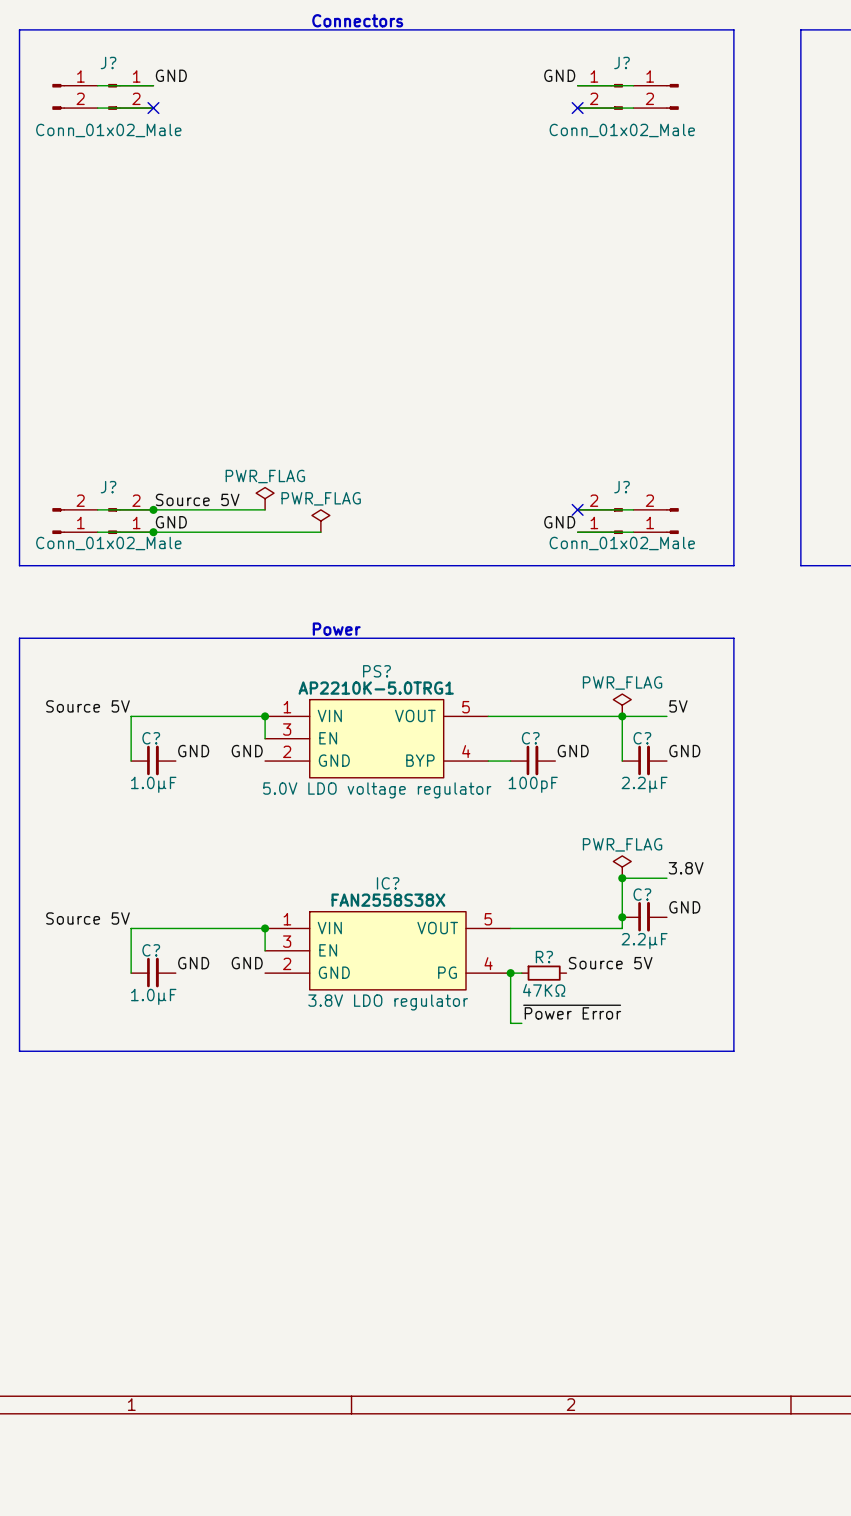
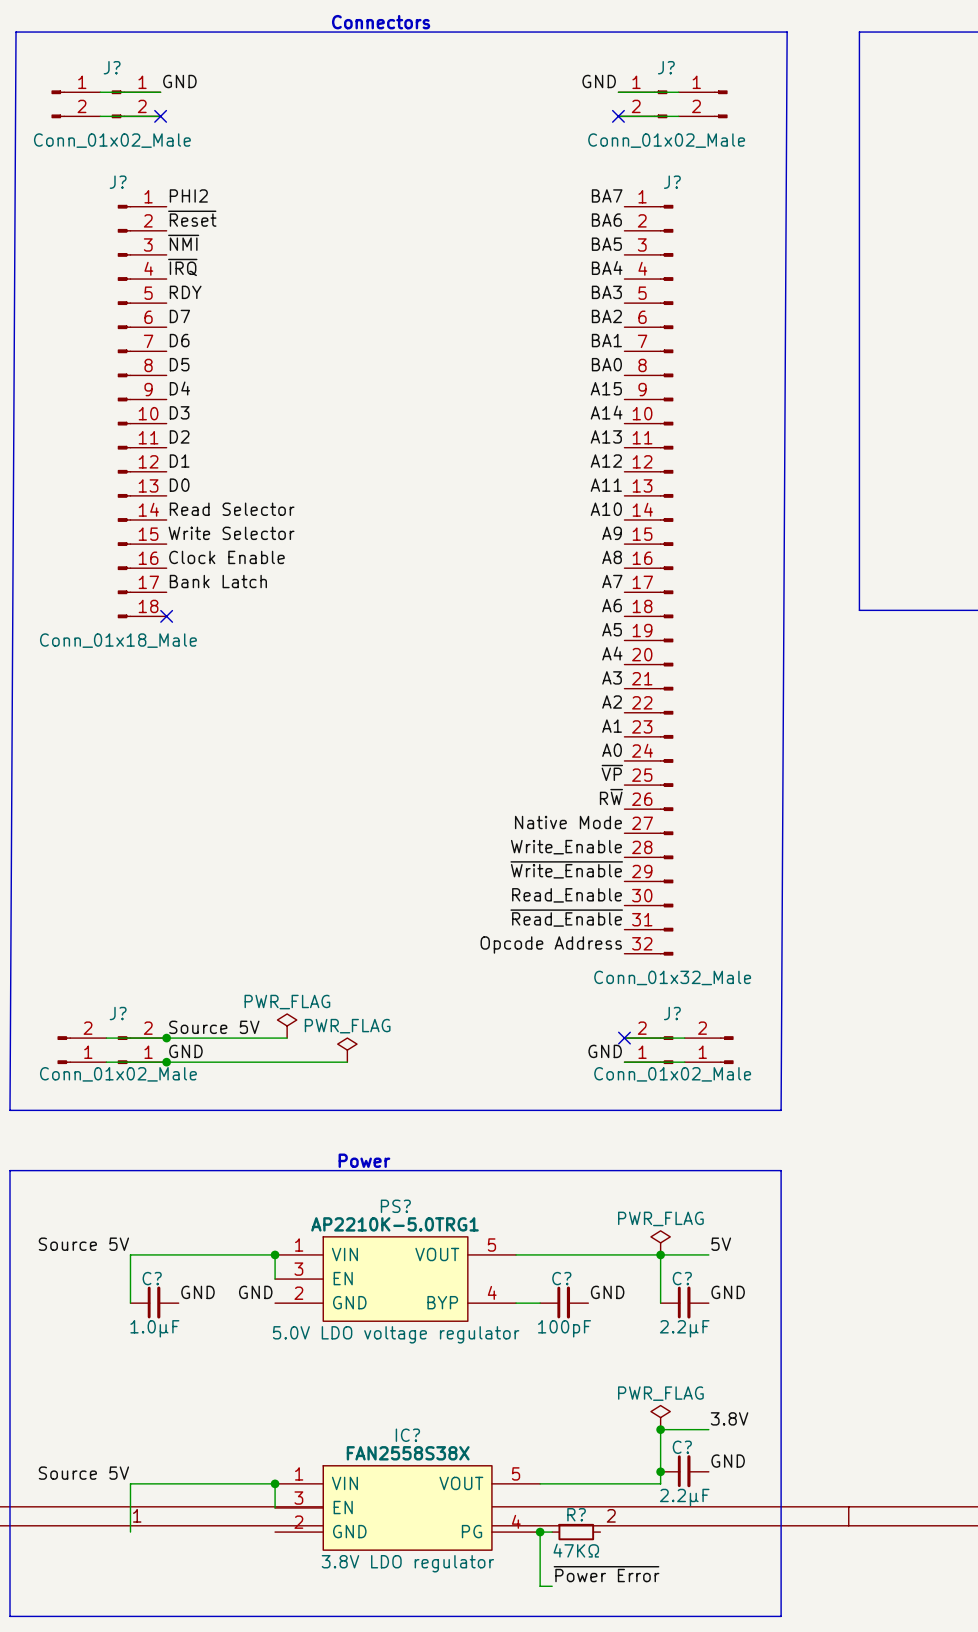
line: (19, 29) (19, 565) (733, 565) (733, 29) -> (16, 32) (10, 1110) (781, 1110) (787, 32)
label: none -> PHI2 (188, 195)
label: none -> BA7 (607, 195)
label: none -> ~{Reset} (192, 218)
label: none -> BA6 (606, 220)
label: none -> ~{NMI} (183, 242)
label: none -> BA5 (606, 244)
label: none -> ~{IRQ} (182, 267)
label: none -> BA4 (607, 267)
label: none -> RDY (185, 292)
label: none -> BA3 (606, 292)
label: none -> D7 (179, 316)
label: none -> BA2 (606, 316)
label: none -> D6 (179, 340)
label: none -> BA1 (606, 340)
label: none -> D5 (179, 364)
label: none -> BA0 (606, 364)
label: none -> D4 (179, 388)
label: none -> A15 (606, 388)
J?: none -> Conn_01x18_Male (142, 411)
label: none -> D3 (179, 412)
label: none -> A14 (606, 412)
label: none -> D2 (179, 436)
label: none -> A13 (606, 436)
label: none -> D1 (179, 461)
label: none -> A12 (606, 461)
label: none -> D0 (179, 485)
label: none -> A11 (606, 485)
label: none -> Read Selector (232, 509)
label: none -> A10 (606, 509)
label: none -> A9 (612, 533)
power symbol: PWR_FLAG (265, 498) -> none
label: Source 5V (197, 499) -> Write Selector (231, 533)
wire: (97, 509) (265, 509) -> none
junction: (153, 509) -> none
wire: (577, 509) (633, 509) -> none
no-connect mark: (577, 509) -> none
part: (74, 521) -> none
J?: Conn_01x02_Male (130, 521) -> none
power symbol: PWR_FLAG (320, 521) -> none
J?: Conn_01x02_Male (600, 521) -> none
part: (656, 521) -> none
label: GND (171, 522) -> Clock Enable (226, 557)
label: GND (559, 522) -> A8 (612, 557)
wire: (97, 532) (320, 532) -> none
junction: (153, 532) -> none
wire: (577, 532) (633, 532) -> none
J?: none -> Conn_01x32_Male (648, 580)
label: none -> Bank Latch (218, 581)
label: none -> A7 (612, 581)
label: none -> A6 (612, 605)
no-connect mark: none -> (166, 616)
label: none -> A5 (612, 629)
label: none -> A4 (612, 653)
label: none -> A3 (612, 677)
text: Power (336, 629) -> none
line: (19, 638) (19, 1051) (733, 1051) (733, 638) (19, 638) -> none
label: none -> A2 (612, 702)
label: none -> A1 (612, 726)
label: none -> A0 (612, 750)
power symbol: PWR_FLAG (622, 705) -> none
label: Source 5V (88, 706) -> none
label: 5V (678, 706) -> none
junction: (265, 716) -> none
wire: (488, 716) (666, 716) -> none
label: none -> ~{VP} (612, 772)
wire: (622, 716) (622, 761) -> none
junction: (622, 716) -> none
wire: (265, 738) (265, 716) (131, 716) (131, 761) -> none
PS?: AP2210K-5.0TRG1 (376, 738) -> none
label: none -> R~{W} (611, 797)
label: GND (193, 751) -> none
label: GND (247, 751) -> none
label: GND (573, 751) -> none
label: GND (684, 751) -> none
C?: (153, 760) -> none
C?: (532, 760) -> none
C?: (644, 760) -> none
label: none -> Native Mode (568, 822)
label: none -> Write_Enable (566, 847)
label: none -> ~{Write_Enable} (566, 869)
label: none -> Read_Enable (567, 895)
label: none -> ~{Read_Enable} (566, 918)
power symbol: PWR_FLAG (622, 867) -> none
label: 3.8V (686, 868) -> none
label: none -> Opcode Address (551, 944)
junction: (622, 878) -> none
wire: (666, 878) (622, 878) (622, 928) (510, 928) -> none
label position: GND (684, 907) -> GND (605, 1051)
C?: (644, 916) -> none
junction: (622, 917) -> none
label position: Source 5V (88, 918) -> Source 5V (214, 1027)
junction: (265, 928) -> none
wire: (265, 950) (265, 928) (131, 928) (131, 973) -> none
power symbol: none -> PWR_FLAG (287, 1026)
IC?: FAN2558S38X (387, 950) -> none
wire: none -> (106, 1038) (287, 1038)
junction: none -> (166, 1038)
wire: none -> (624, 1038) (684, 1038)
no-connect mark: none -> (624, 1038)
label position: GND (193, 963) -> GND (185, 1051)
label: GND (247, 963) -> none
label: Source 5V (610, 963) -> none
C?: (153, 972) -> none
part: none -> (81, 1050)
J?: none -> Conn_01x02_Male (142, 1050)
power symbol: none -> PWR_FLAG (347, 1050)
junction: (510, 973) -> none
wire: (521, 973) (510, 973) (510, 1023) (521, 1023) -> none
R?: (544, 973) -> none
J?: none -> Conn_01x02_Male (648, 1050)
part: none -> (709, 1050)
wire: none -> (106, 1062) (347, 1062)
junction: none -> (166, 1062)
wire: none -> (624, 1062) (684, 1062)
label: ~{Power Error} (572, 1012) -> none
text: none -> Power (364, 1160)
line: none -> (10, 1170) (781, 1170) (781, 1616) (10, 1616) (10, 1170)
power symbol: none -> PWR_FLAG (660, 1242)
label: none -> Source 5V (83, 1244)
label: none -> 5V (721, 1244)
junction: none -> (275, 1254)
wire: none -> (516, 1254) (708, 1254)
wire: none -> (660, 1254) (660, 1303)
junction: none -> (660, 1254)
wire: none -> (275, 1279) (275, 1254) (130, 1254) (130, 1303)
PS?: none -> AP2210K-5.0TRG1 (395, 1279)
label: none -> GND (197, 1292)
label: none -> GND (255, 1292)
label: none -> GND (607, 1292)
label: none -> GND (728, 1292)
C?: none -> (154, 1302)
C?: none -> (564, 1302)
C?: none -> (684, 1302)
wire: none -> (516, 1303) (540, 1303)
power symbol: none -> PWR_FLAG (660, 1417)
label: none -> 3.8V (729, 1418)
junction: none -> (660, 1429)
wire: none -> (708, 1429) (660, 1429) (660, 1483) (540, 1483)
label: none -> GND (728, 1461)
junction: none -> (660, 1471)
C?: none -> (684, 1471)
label: none -> Source 5V (83, 1473)
junction: none -> (275, 1483)
wire: none -> (275, 1507) (275, 1483) (130, 1483) (130, 1532)
IC?: none -> FAN2558S38X (407, 1507)
junction: none -> (540, 1532)
wire: none -> (552, 1532) (540, 1532) (540, 1586) (552, 1586)
R?: none -> (576, 1532)
label: none -> ~{Power Error} (606, 1574)

